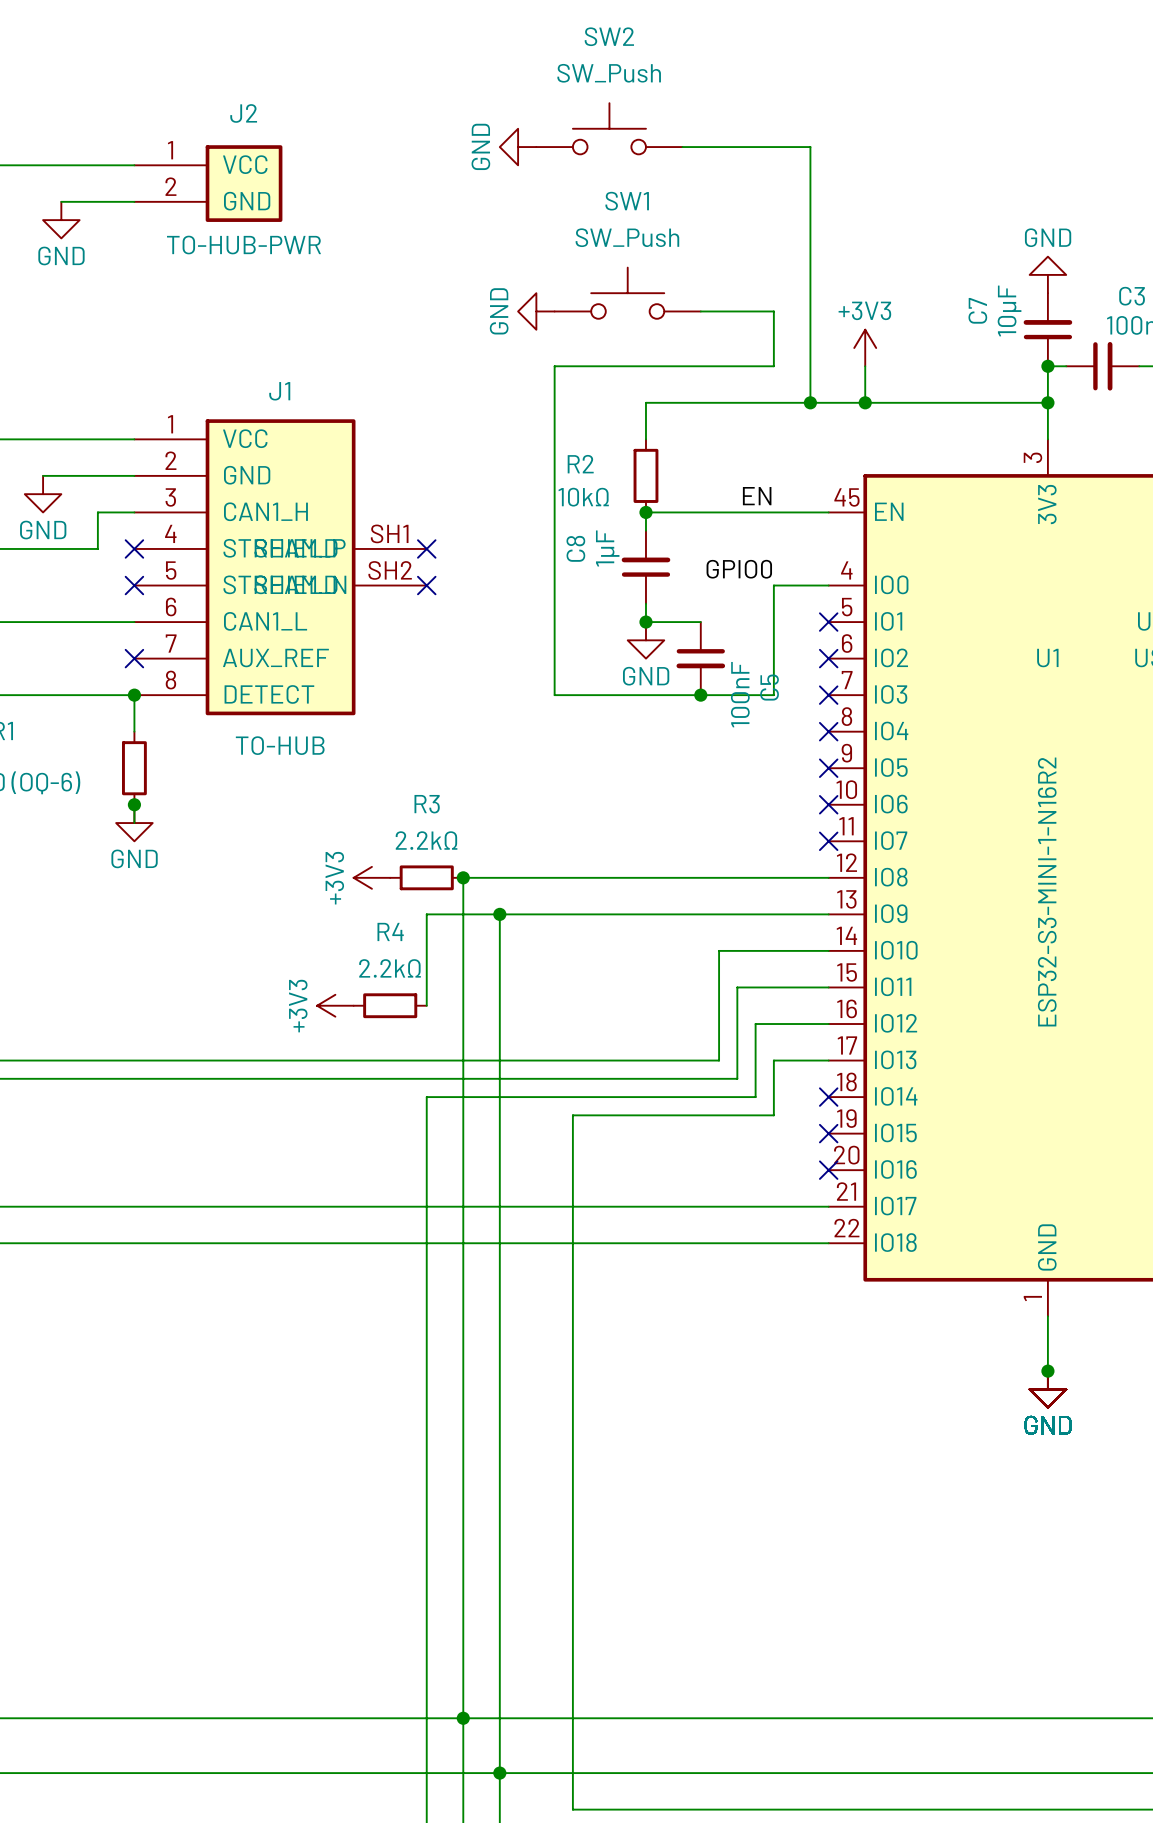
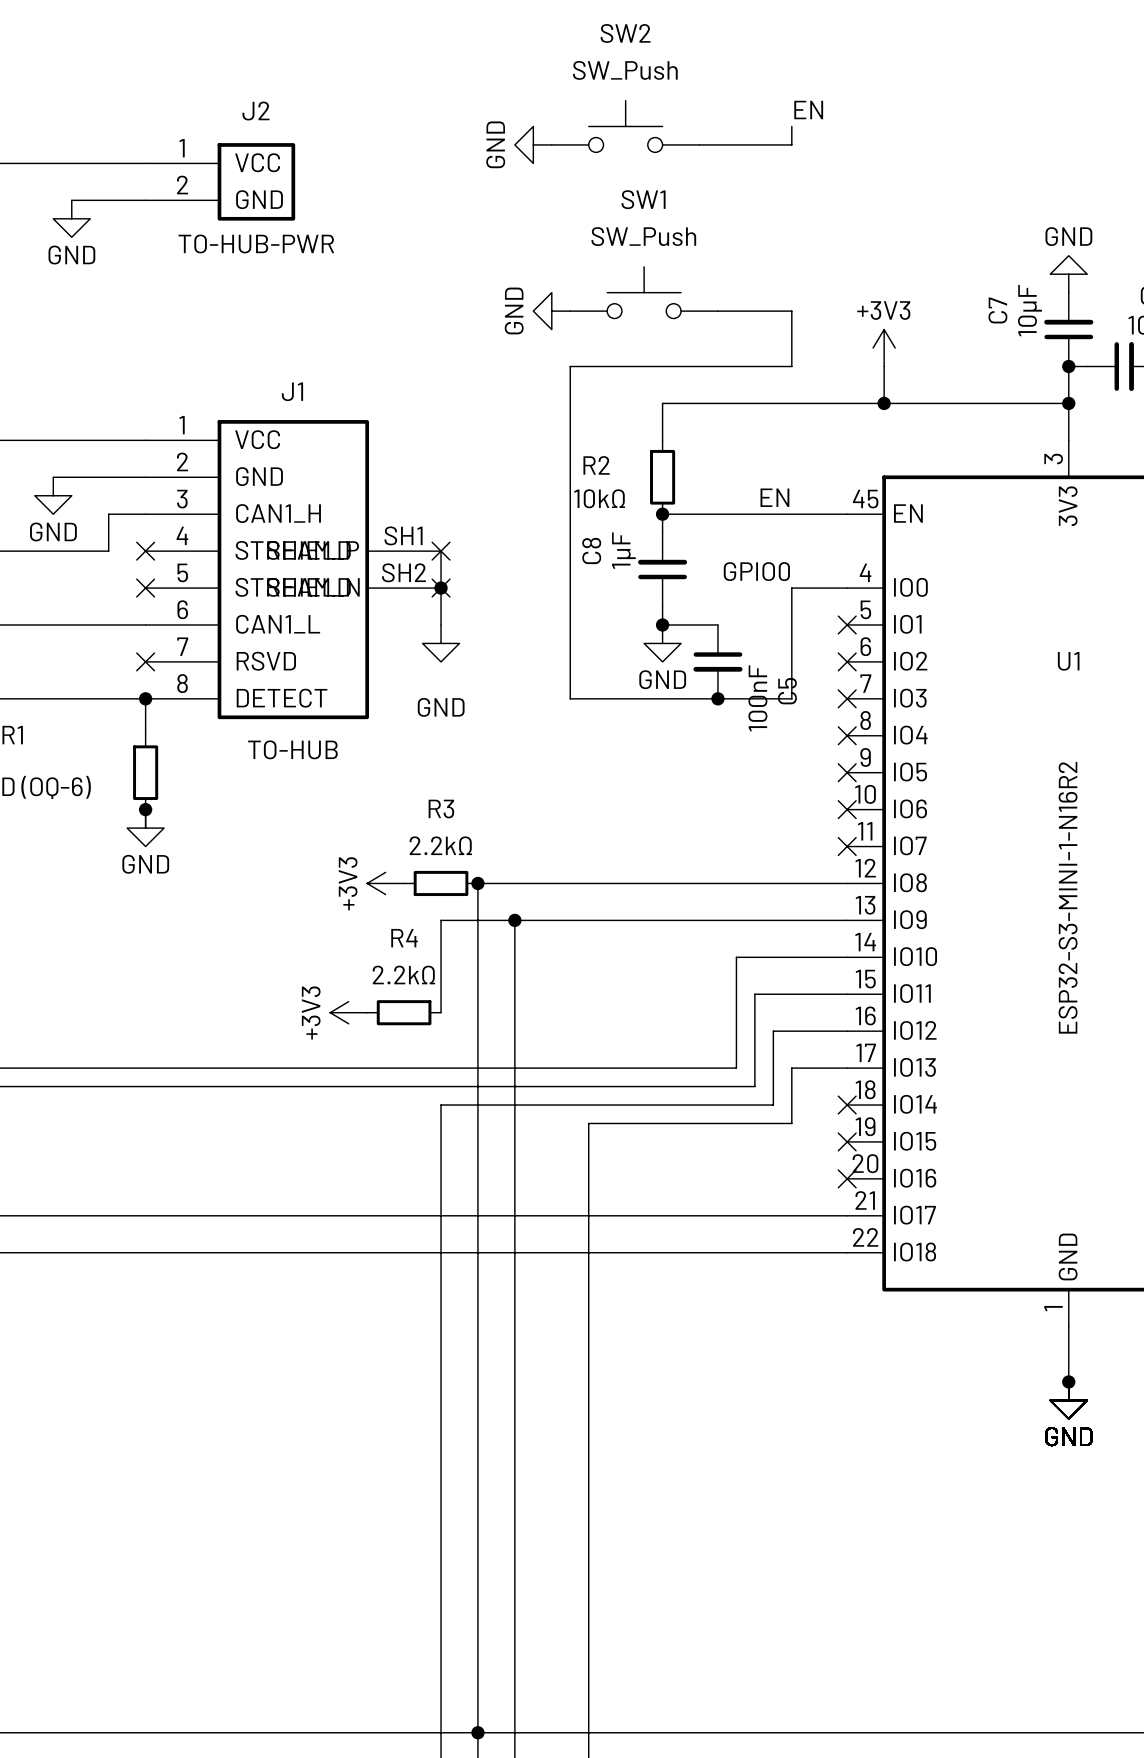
label: none -> EN (808, 110)
wire: (773, 147) (810, 147) (810, 402) -> (791, 144) (791, 126)
junction: (810, 402) -> none
wire: none -> (441, 551) (441, 624)
junction: none -> (441, 588)
power symbol: none -> GND (441, 643)
J1 pin name: AUX_REF (275, 658) -> RSVD (266, 661)

